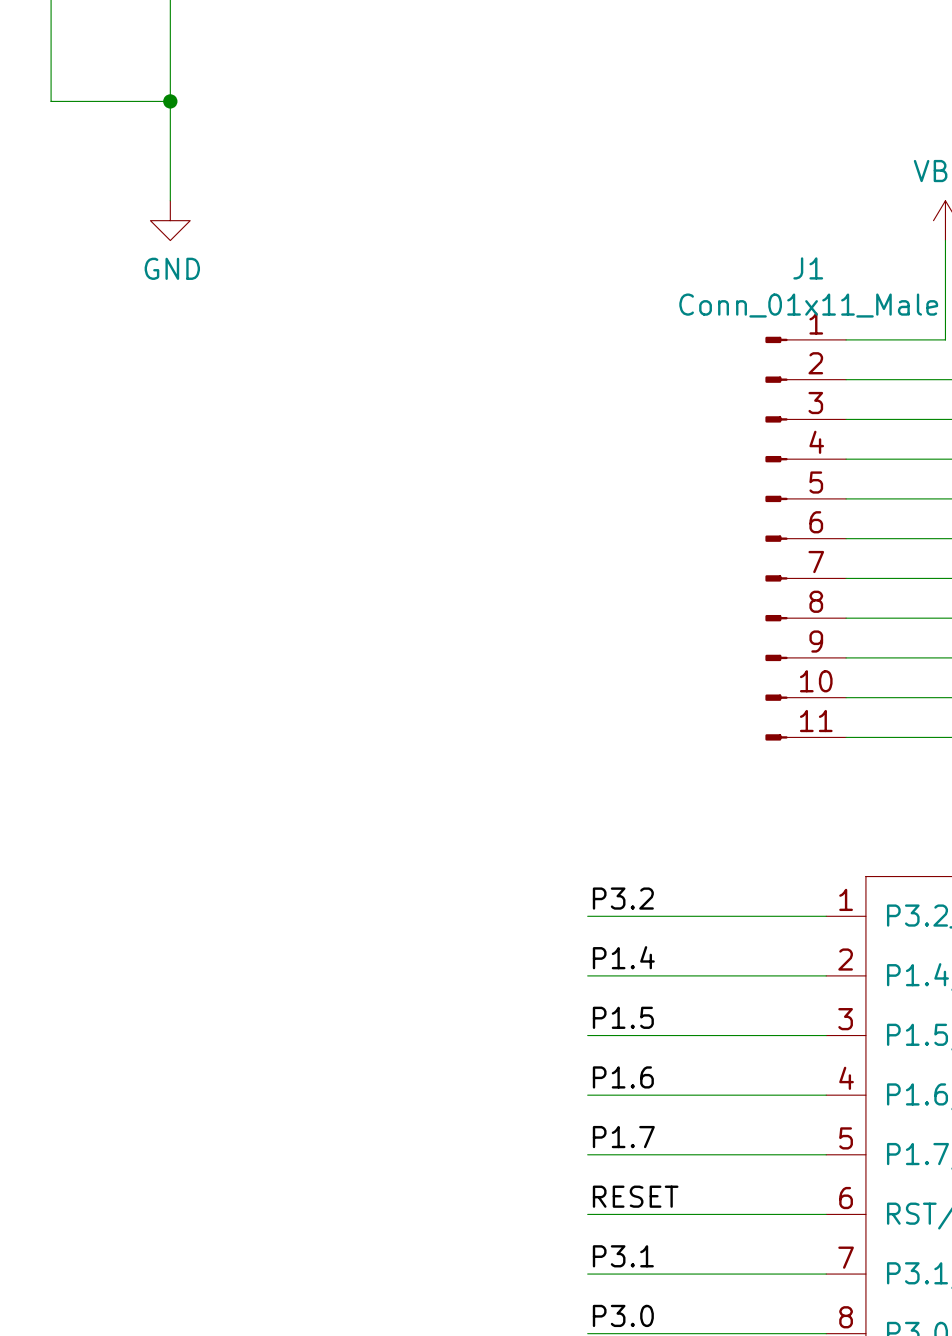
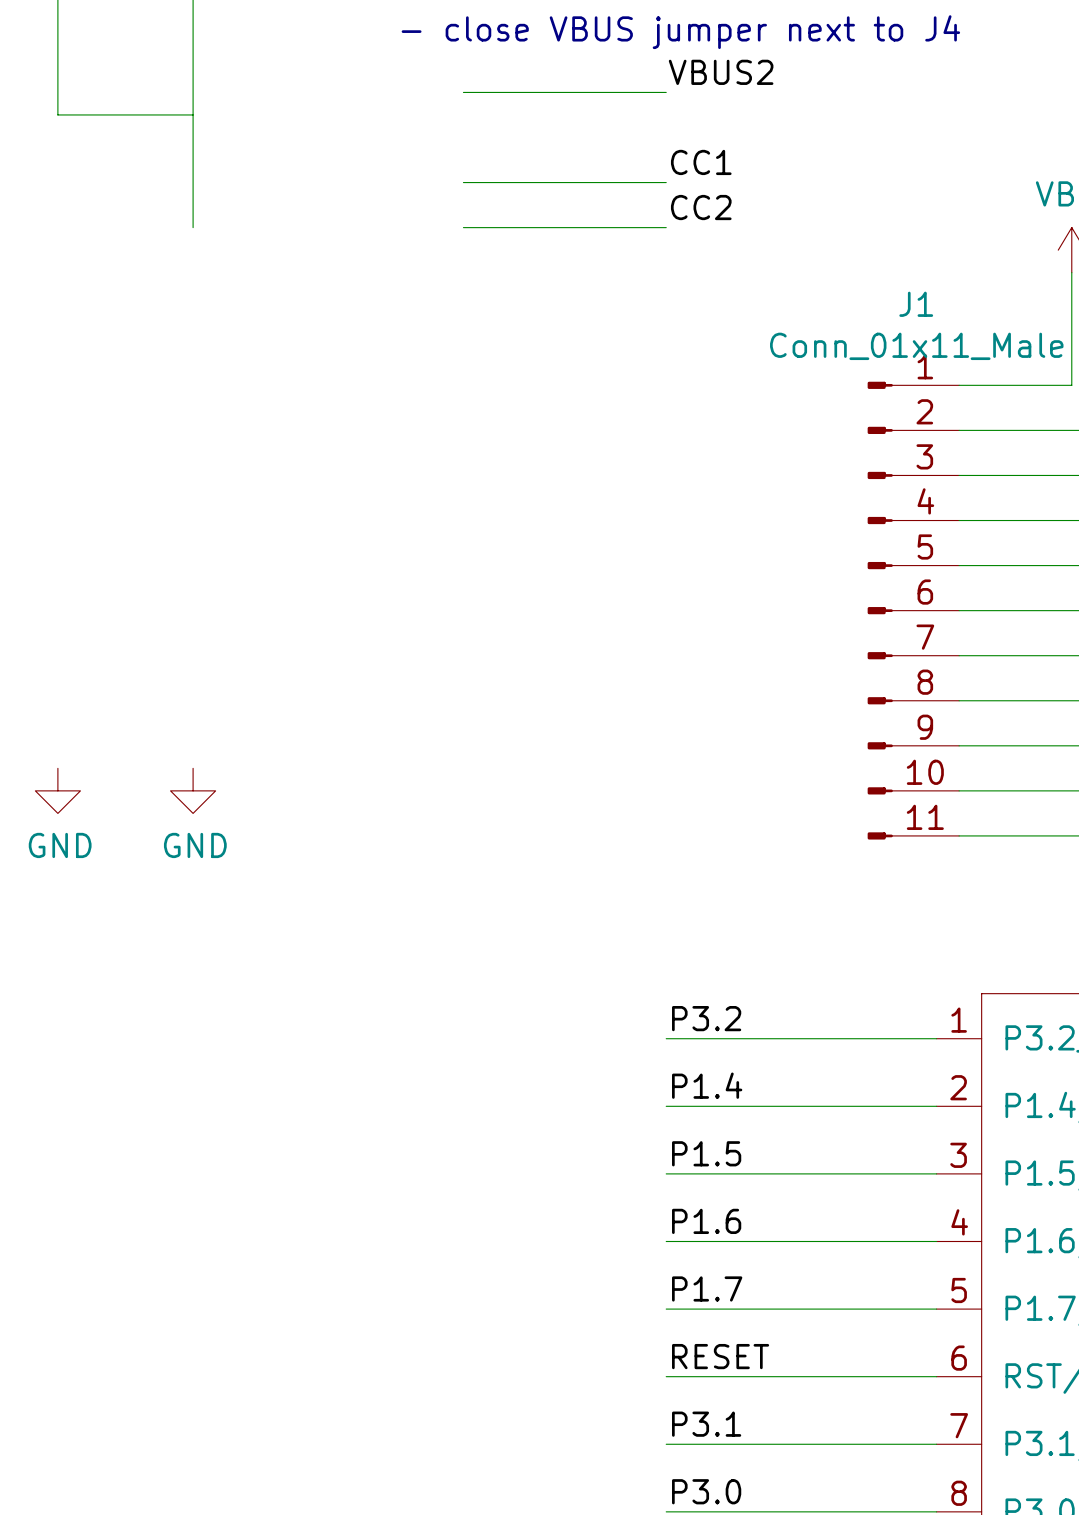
text: none -> - close VBUS jumper next to J4 (680, 32)
label: none -> VBUS2 (721, 72)
wire: none -> (463, 92) (666, 92)
junction: (170, 101) -> none
label: none -> CC1 (701, 162)
wire: none -> (463, 182) (666, 182)
label: none -> CC2 (701, 207)
wire: none -> (463, 227) (666, 227)
power symbol: GND (170, 220) -> none
power symbol: none -> GND (57, 790)
power symbol: none -> GND (193, 790)

